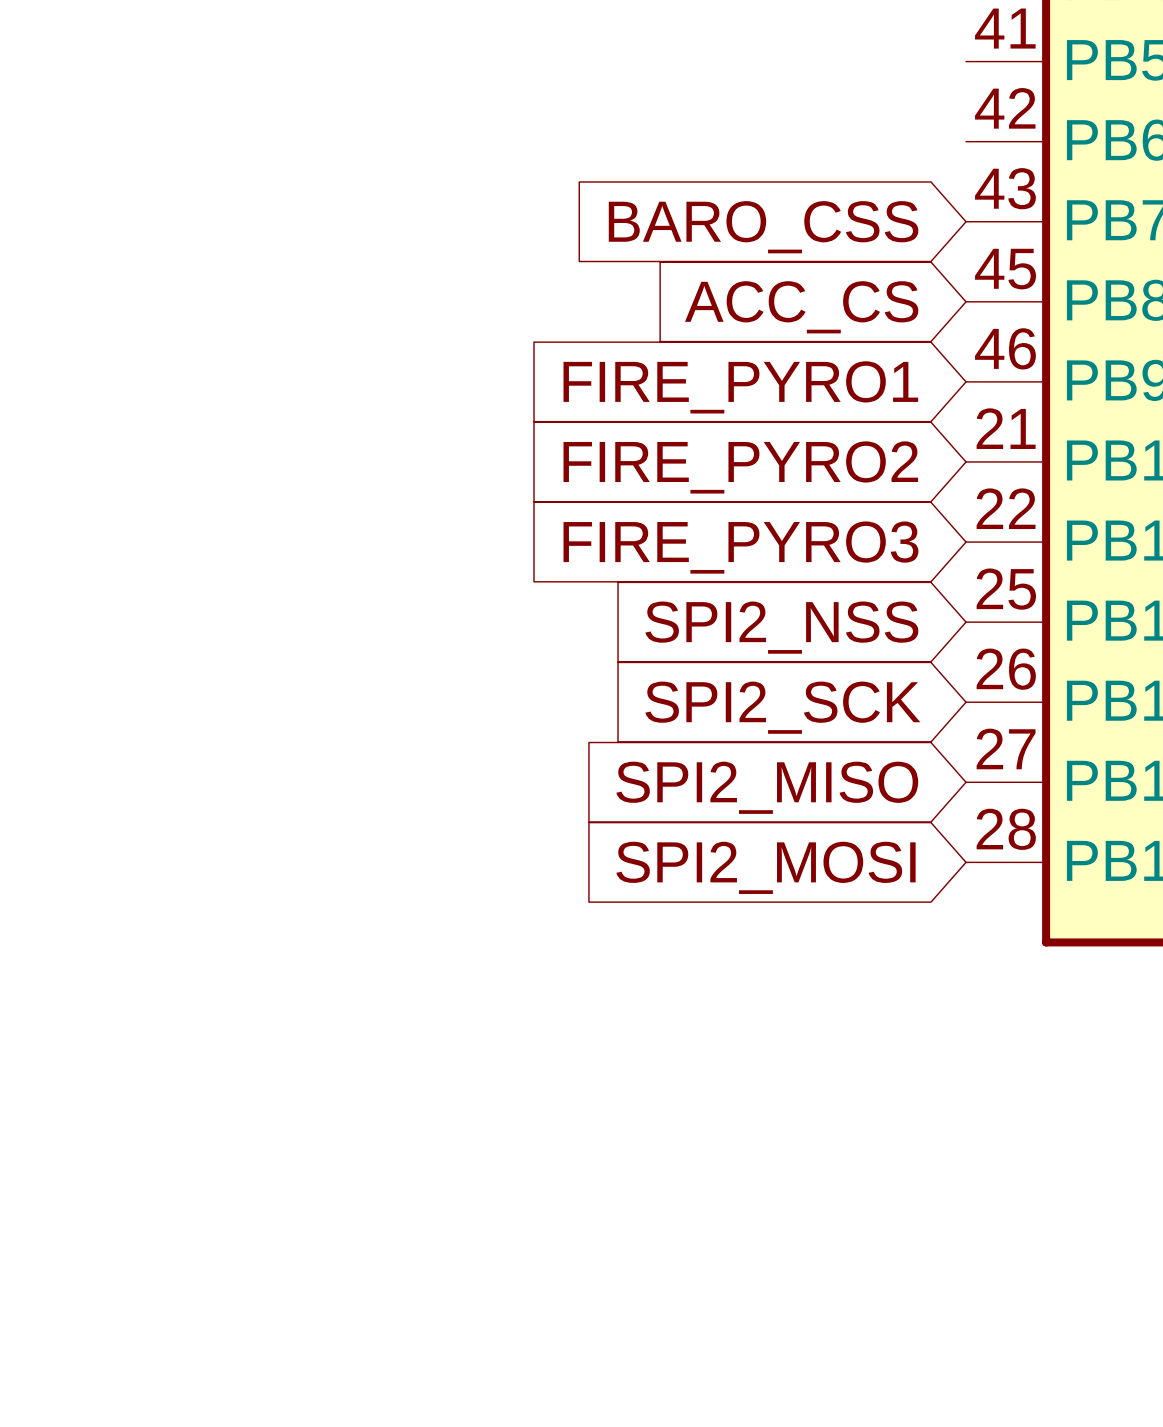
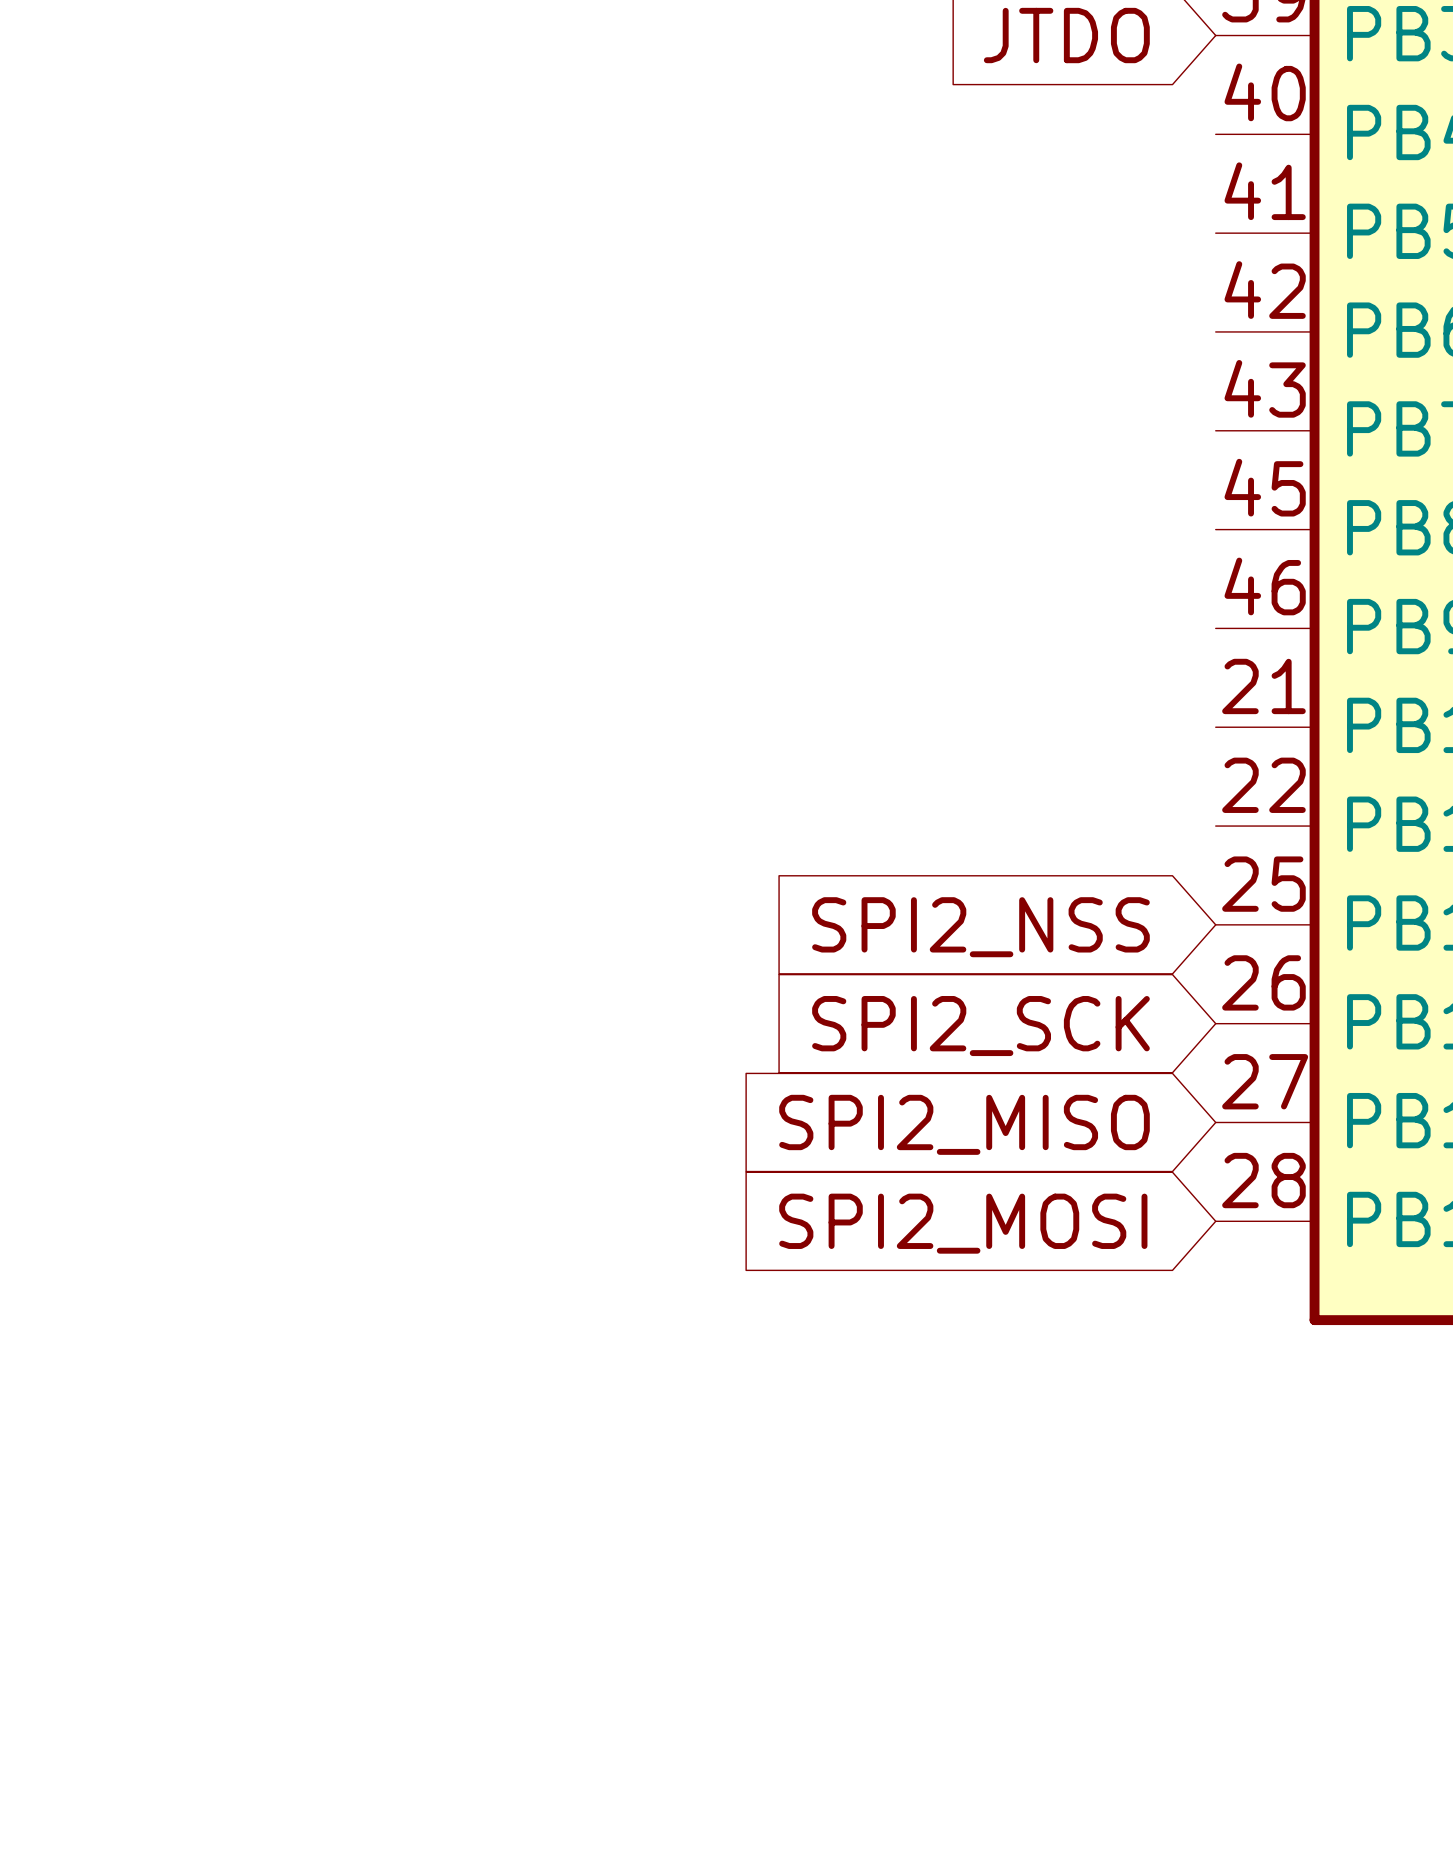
global label: BARO_CSS (763, 227) -> none
global label: ACC_CS (801, 307) -> none
global label: FIRE_PYRO1 (740, 387) -> none
global label: FIRE_PYRO2 (740, 467) -> none
global label: FIRE_PYRO3 (740, 547) -> none

